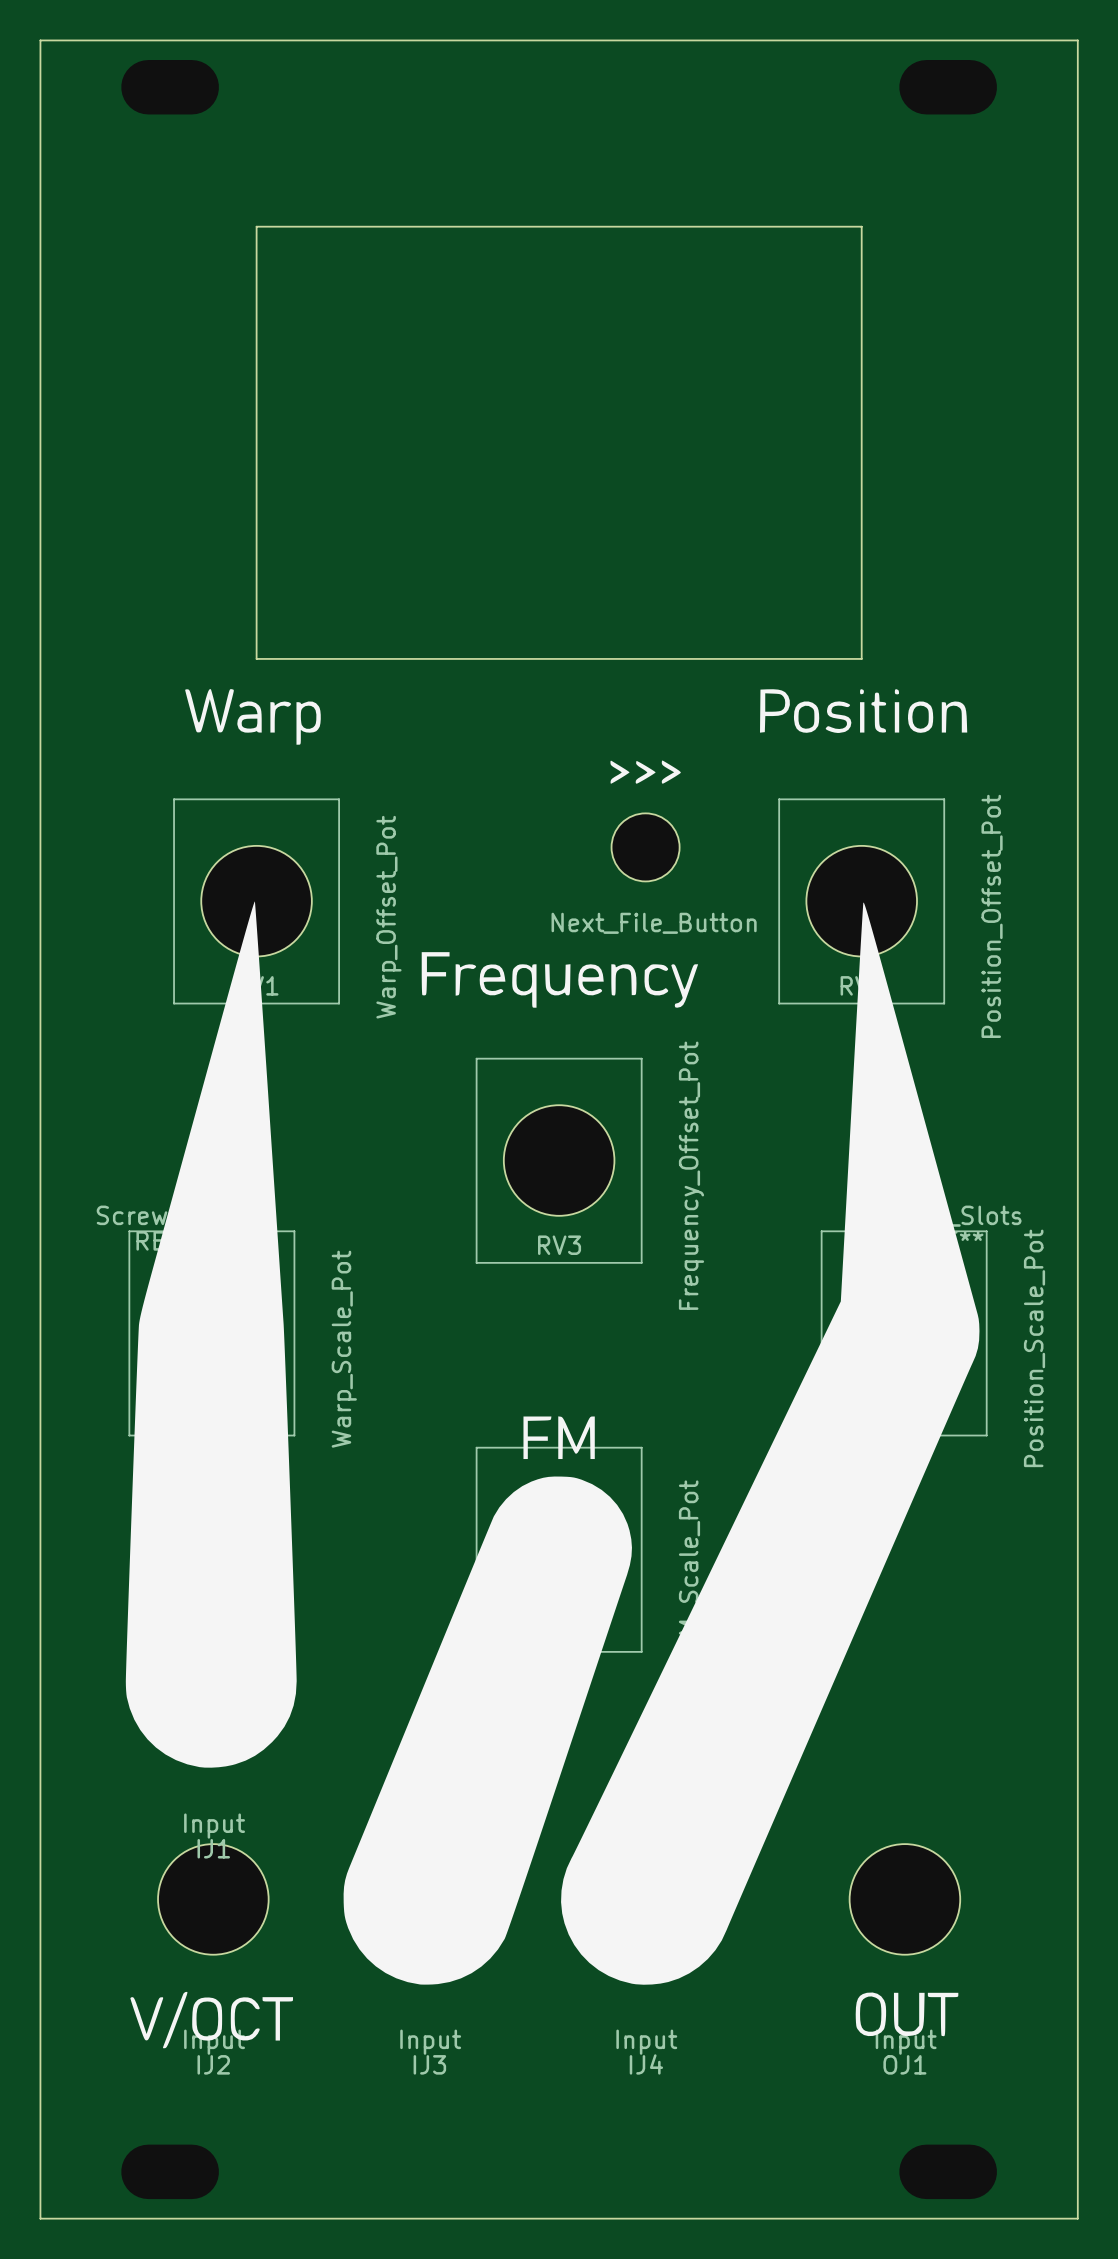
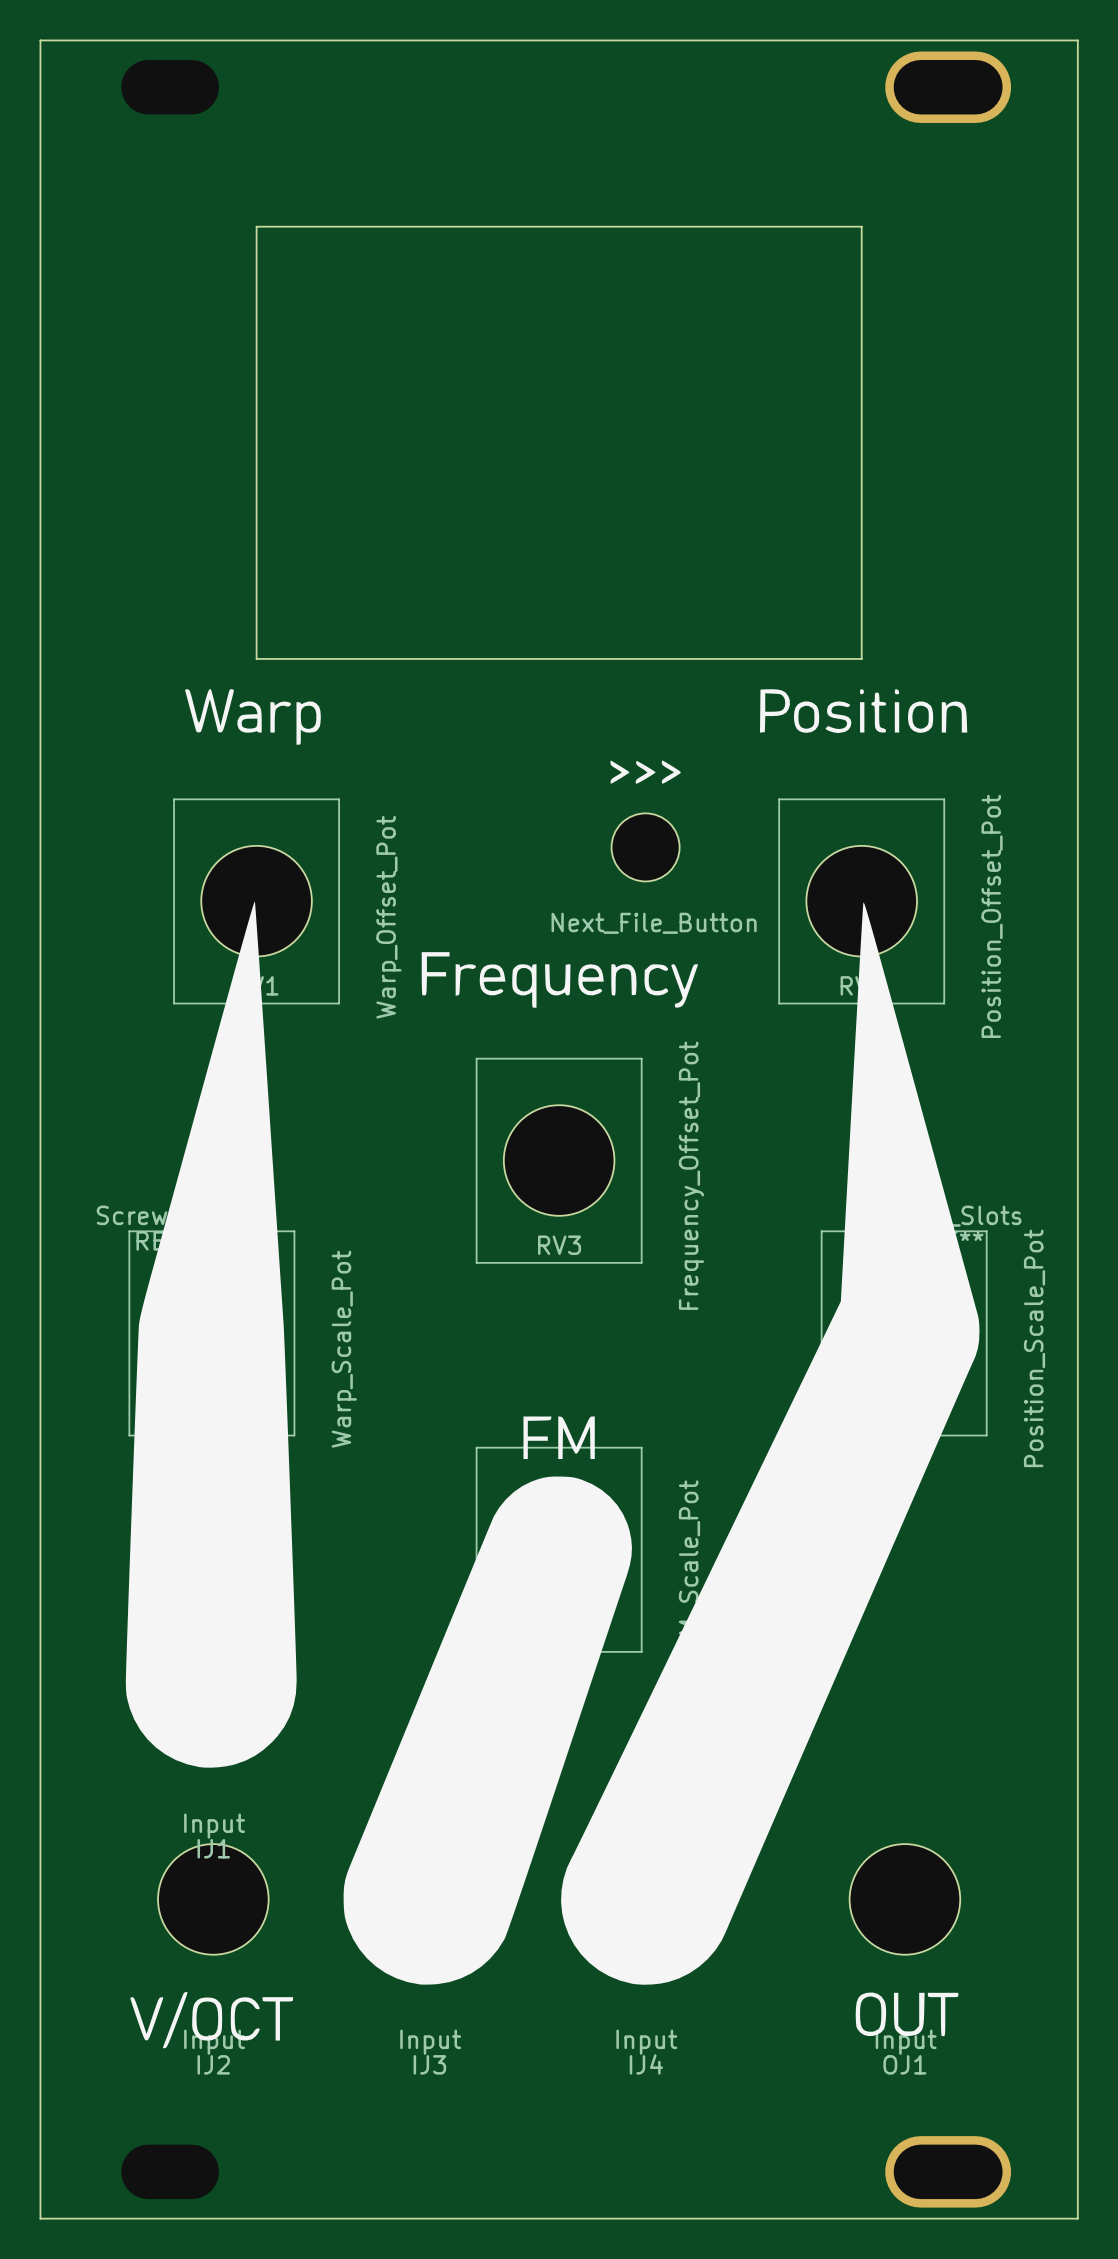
part footprint: [899, 60, 997, 2200] -> [885, 51, 1012, 2208]

